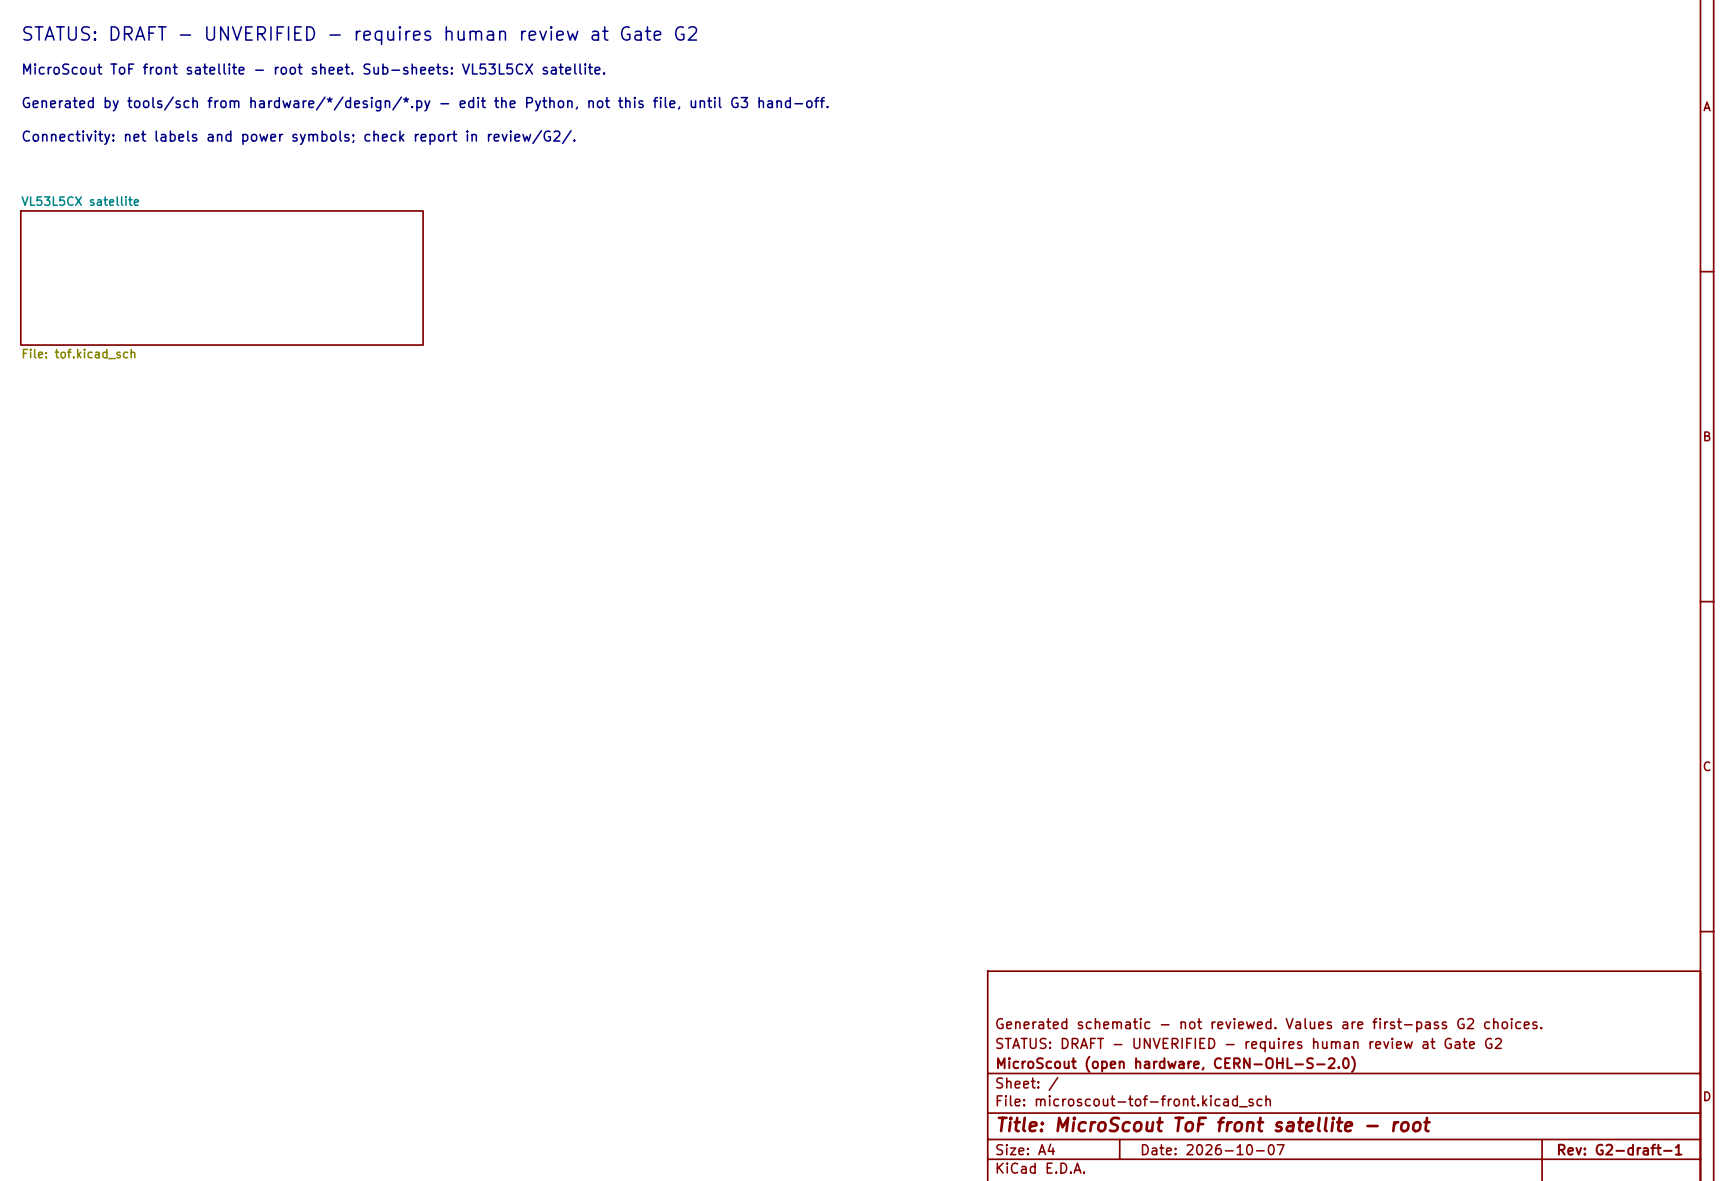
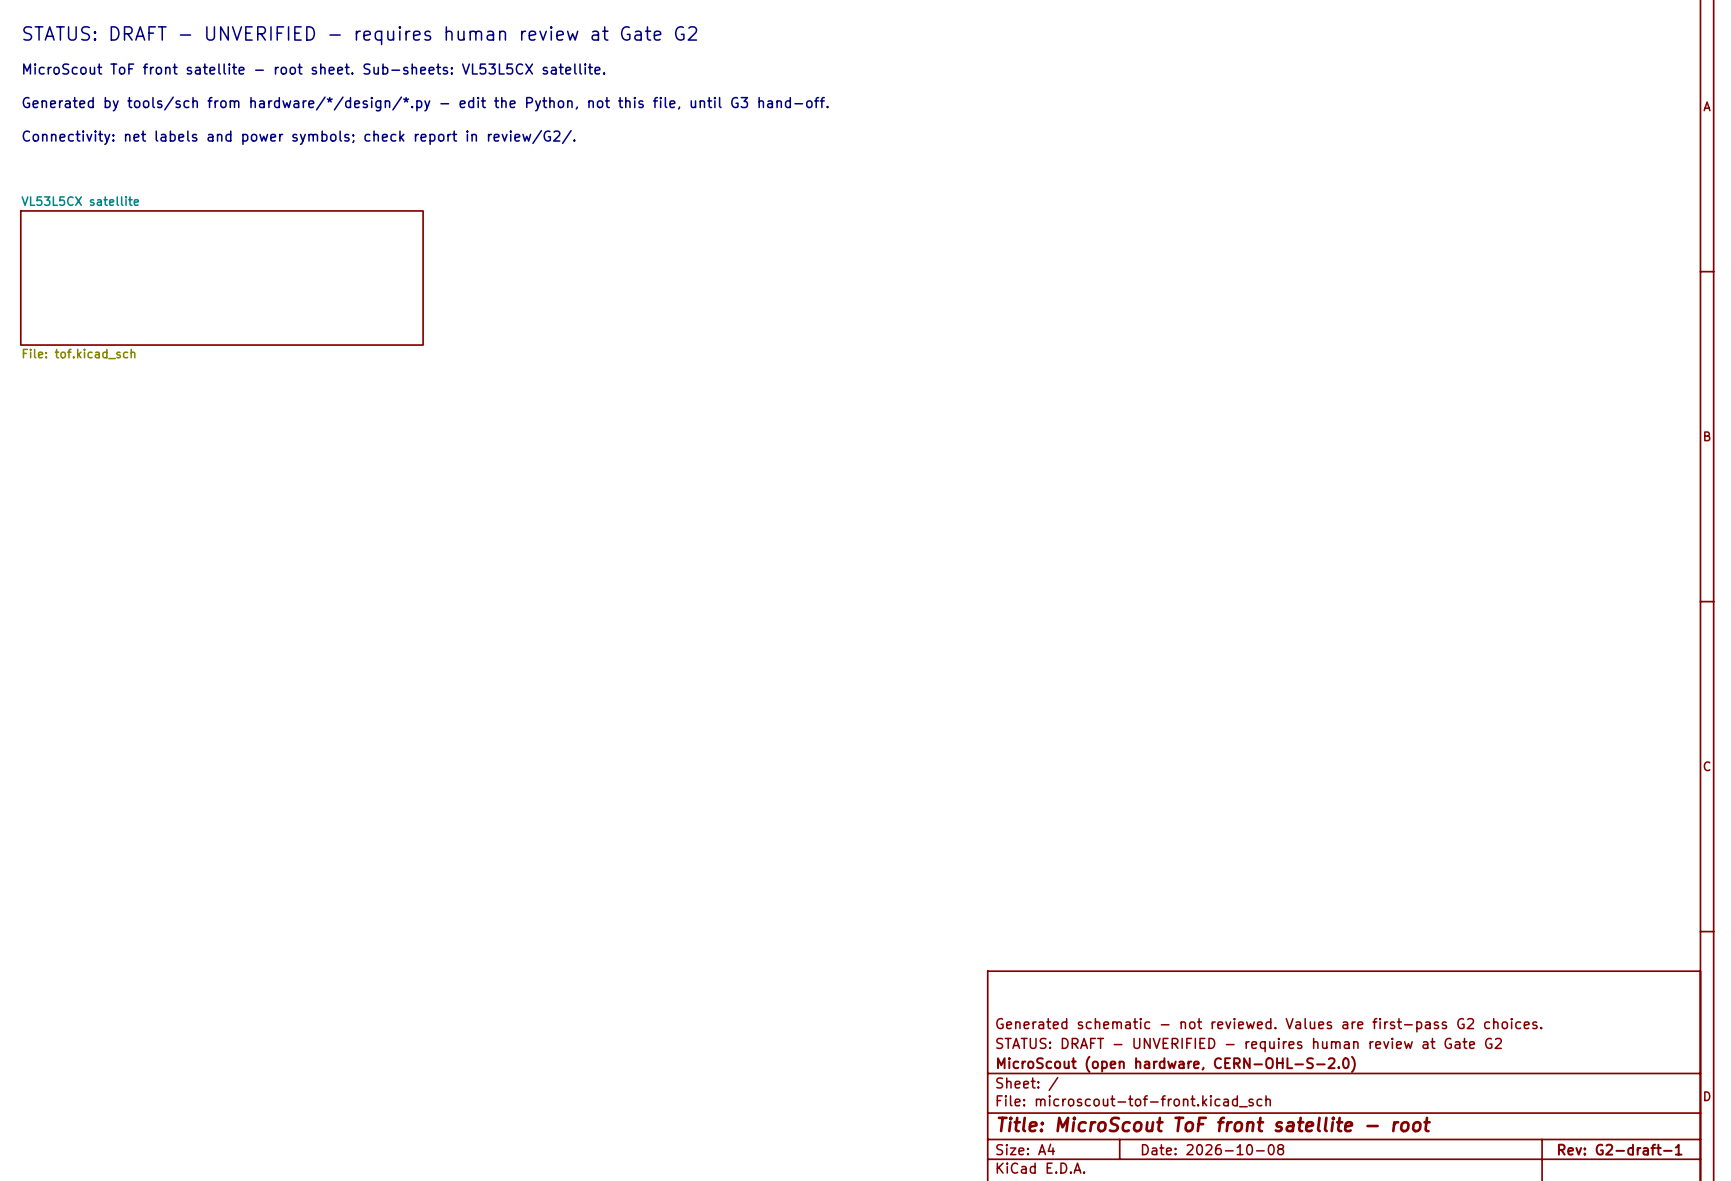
title block: Date: 2026-10-07 (1213, 1149) -> Date: 2026-10-08 (1213, 1149)

